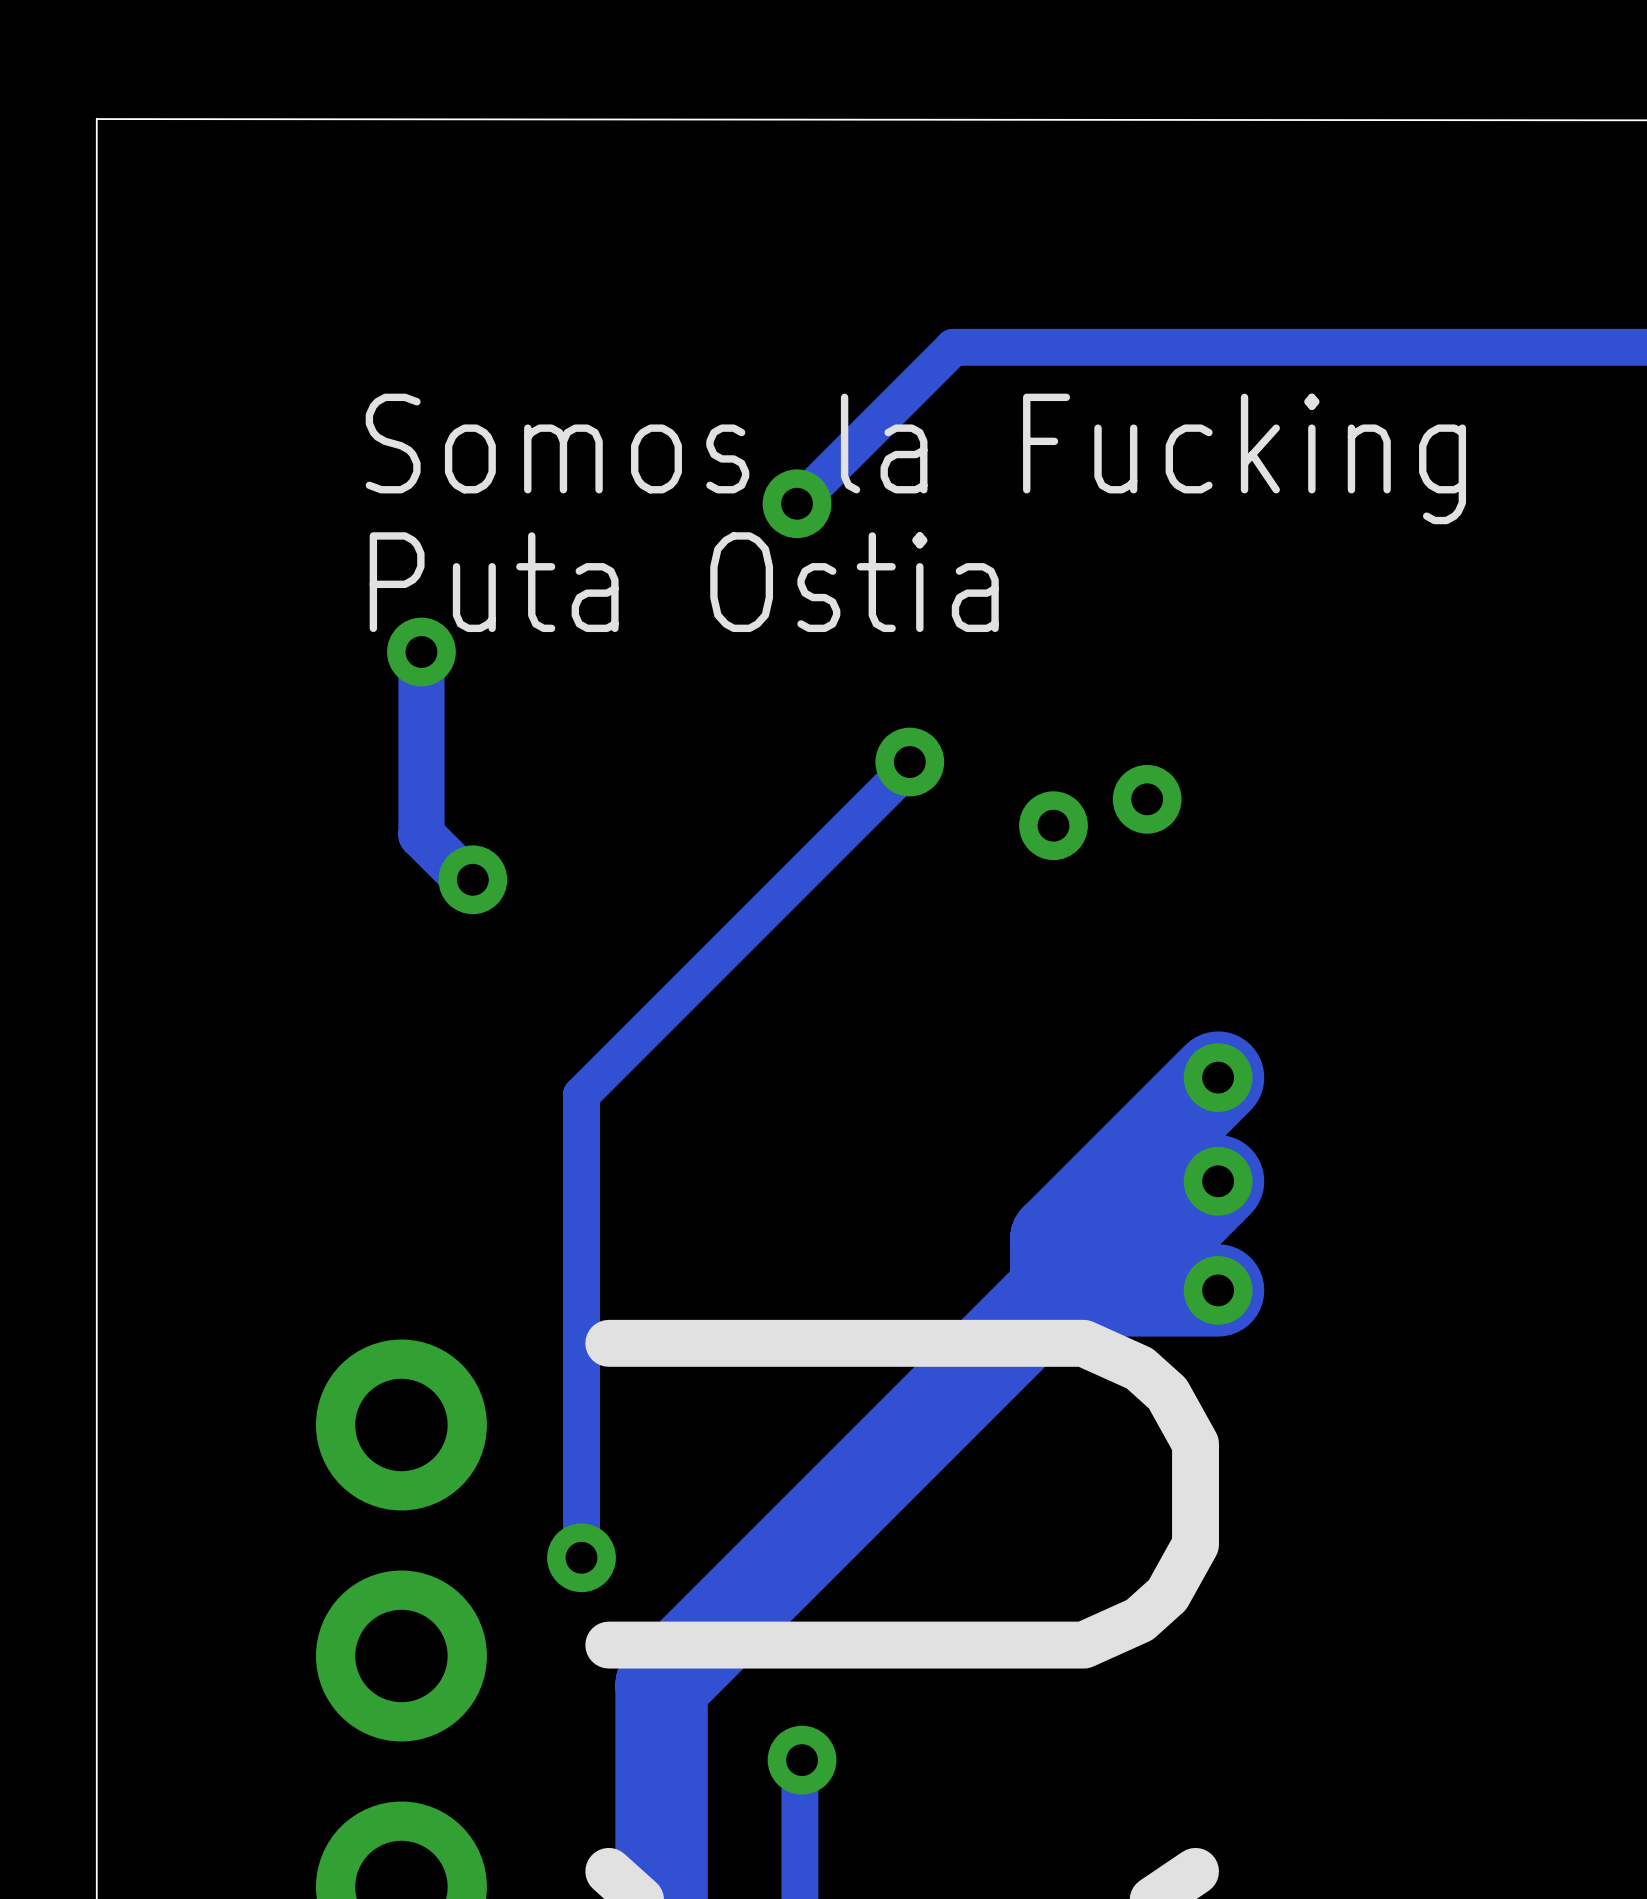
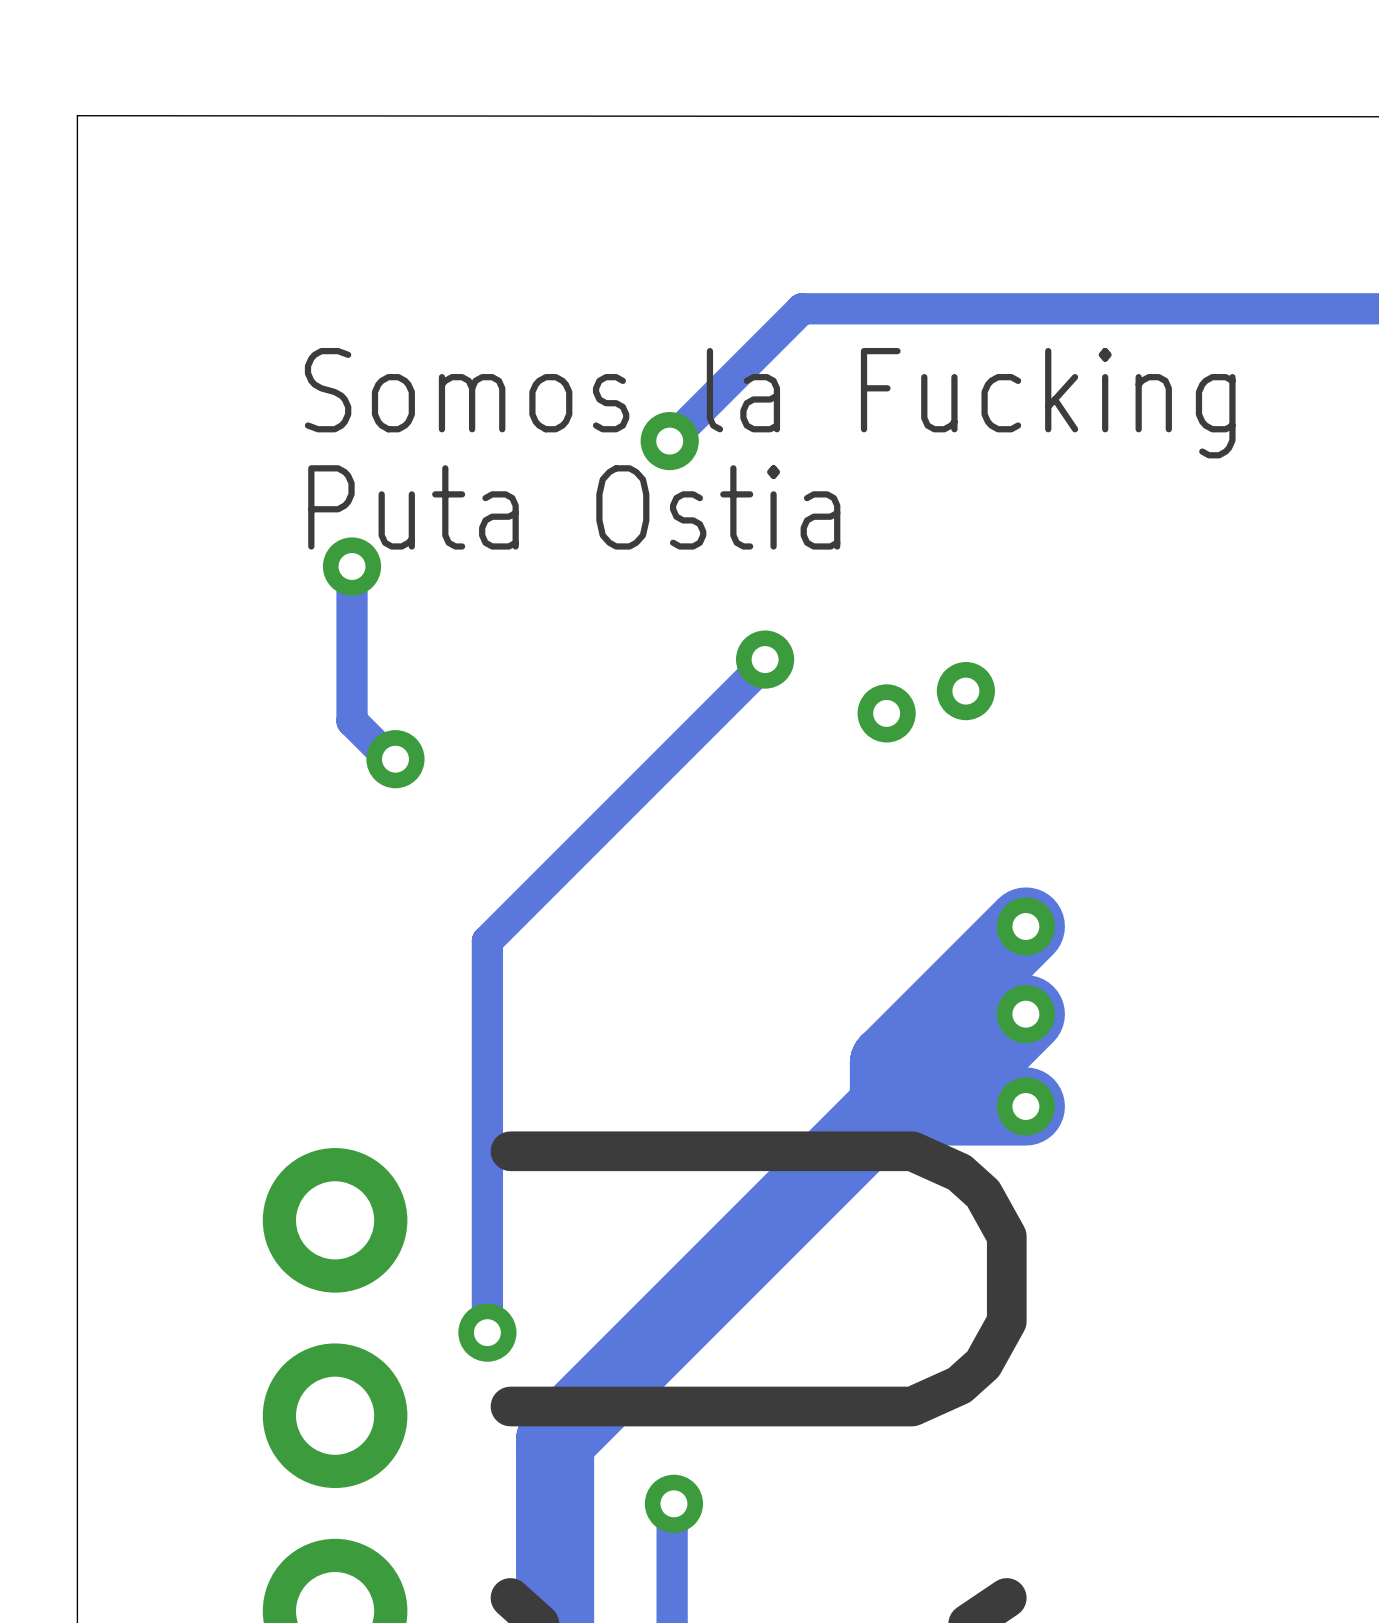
track width: thick (421, 651) (421, 834) (469, 882) -> thin (352, 566) (352, 721) (392, 761)

